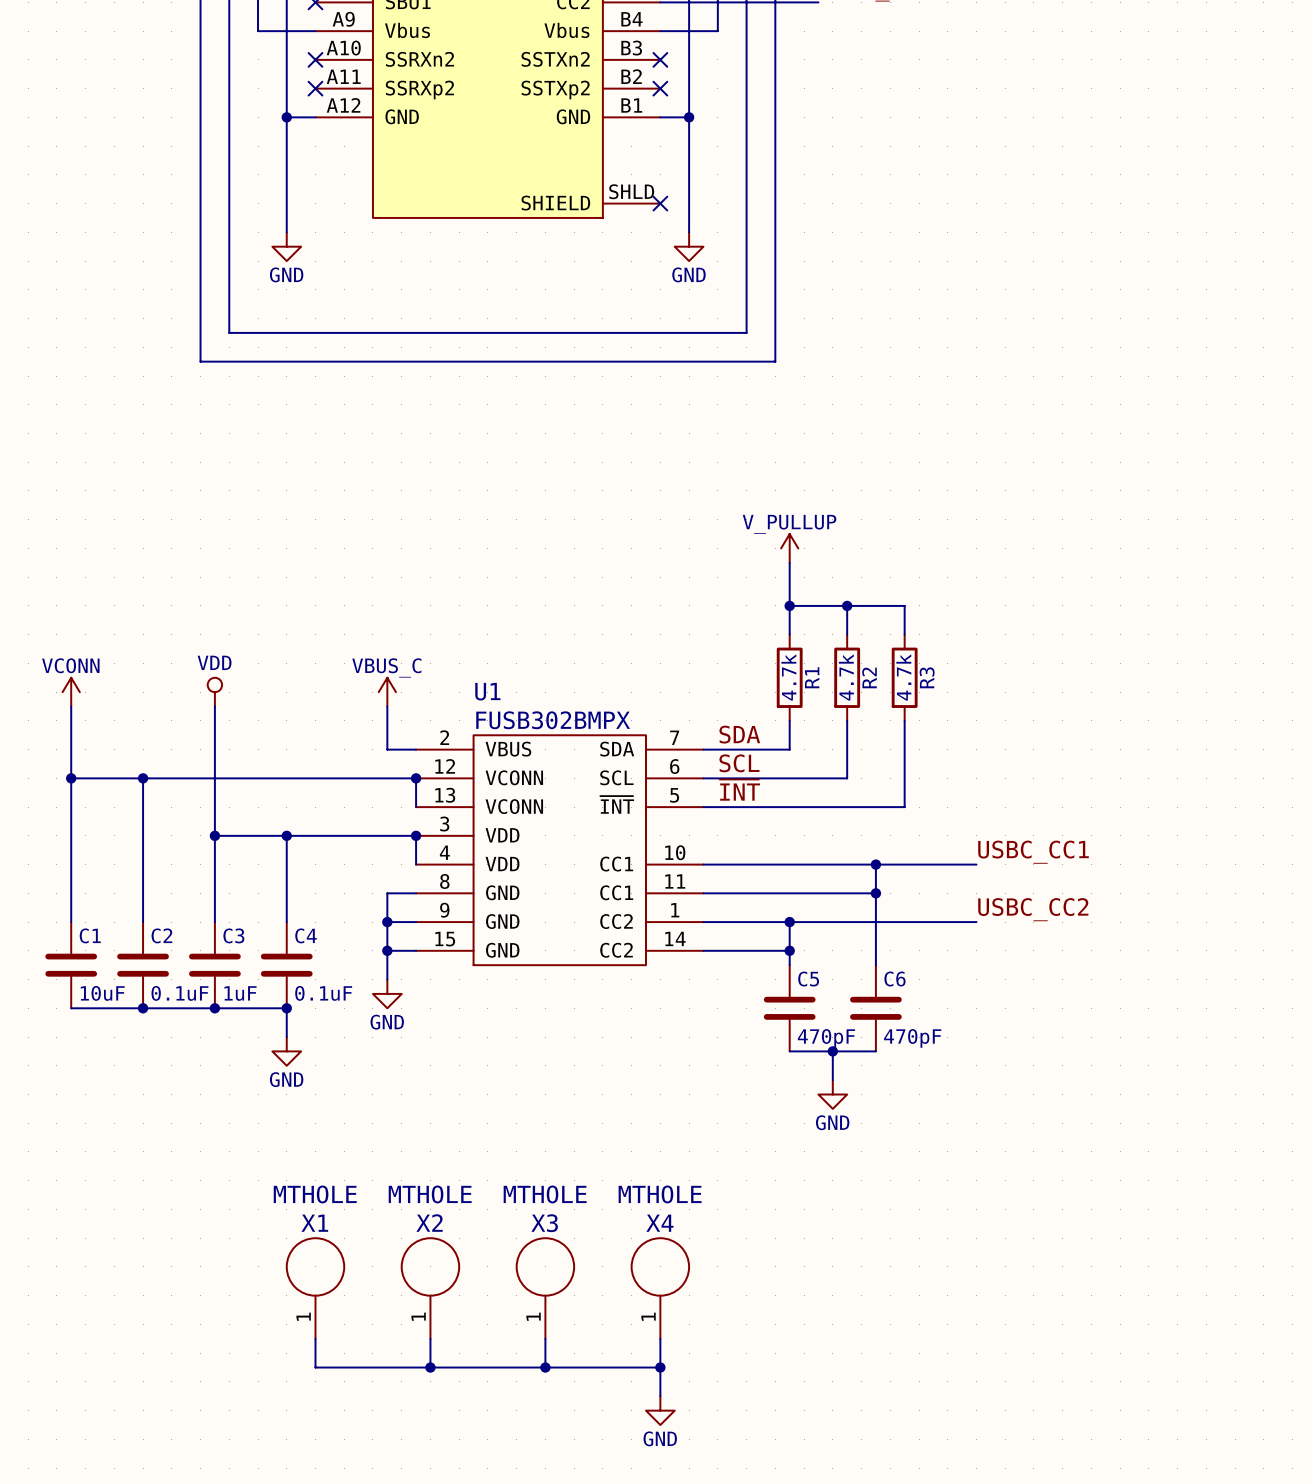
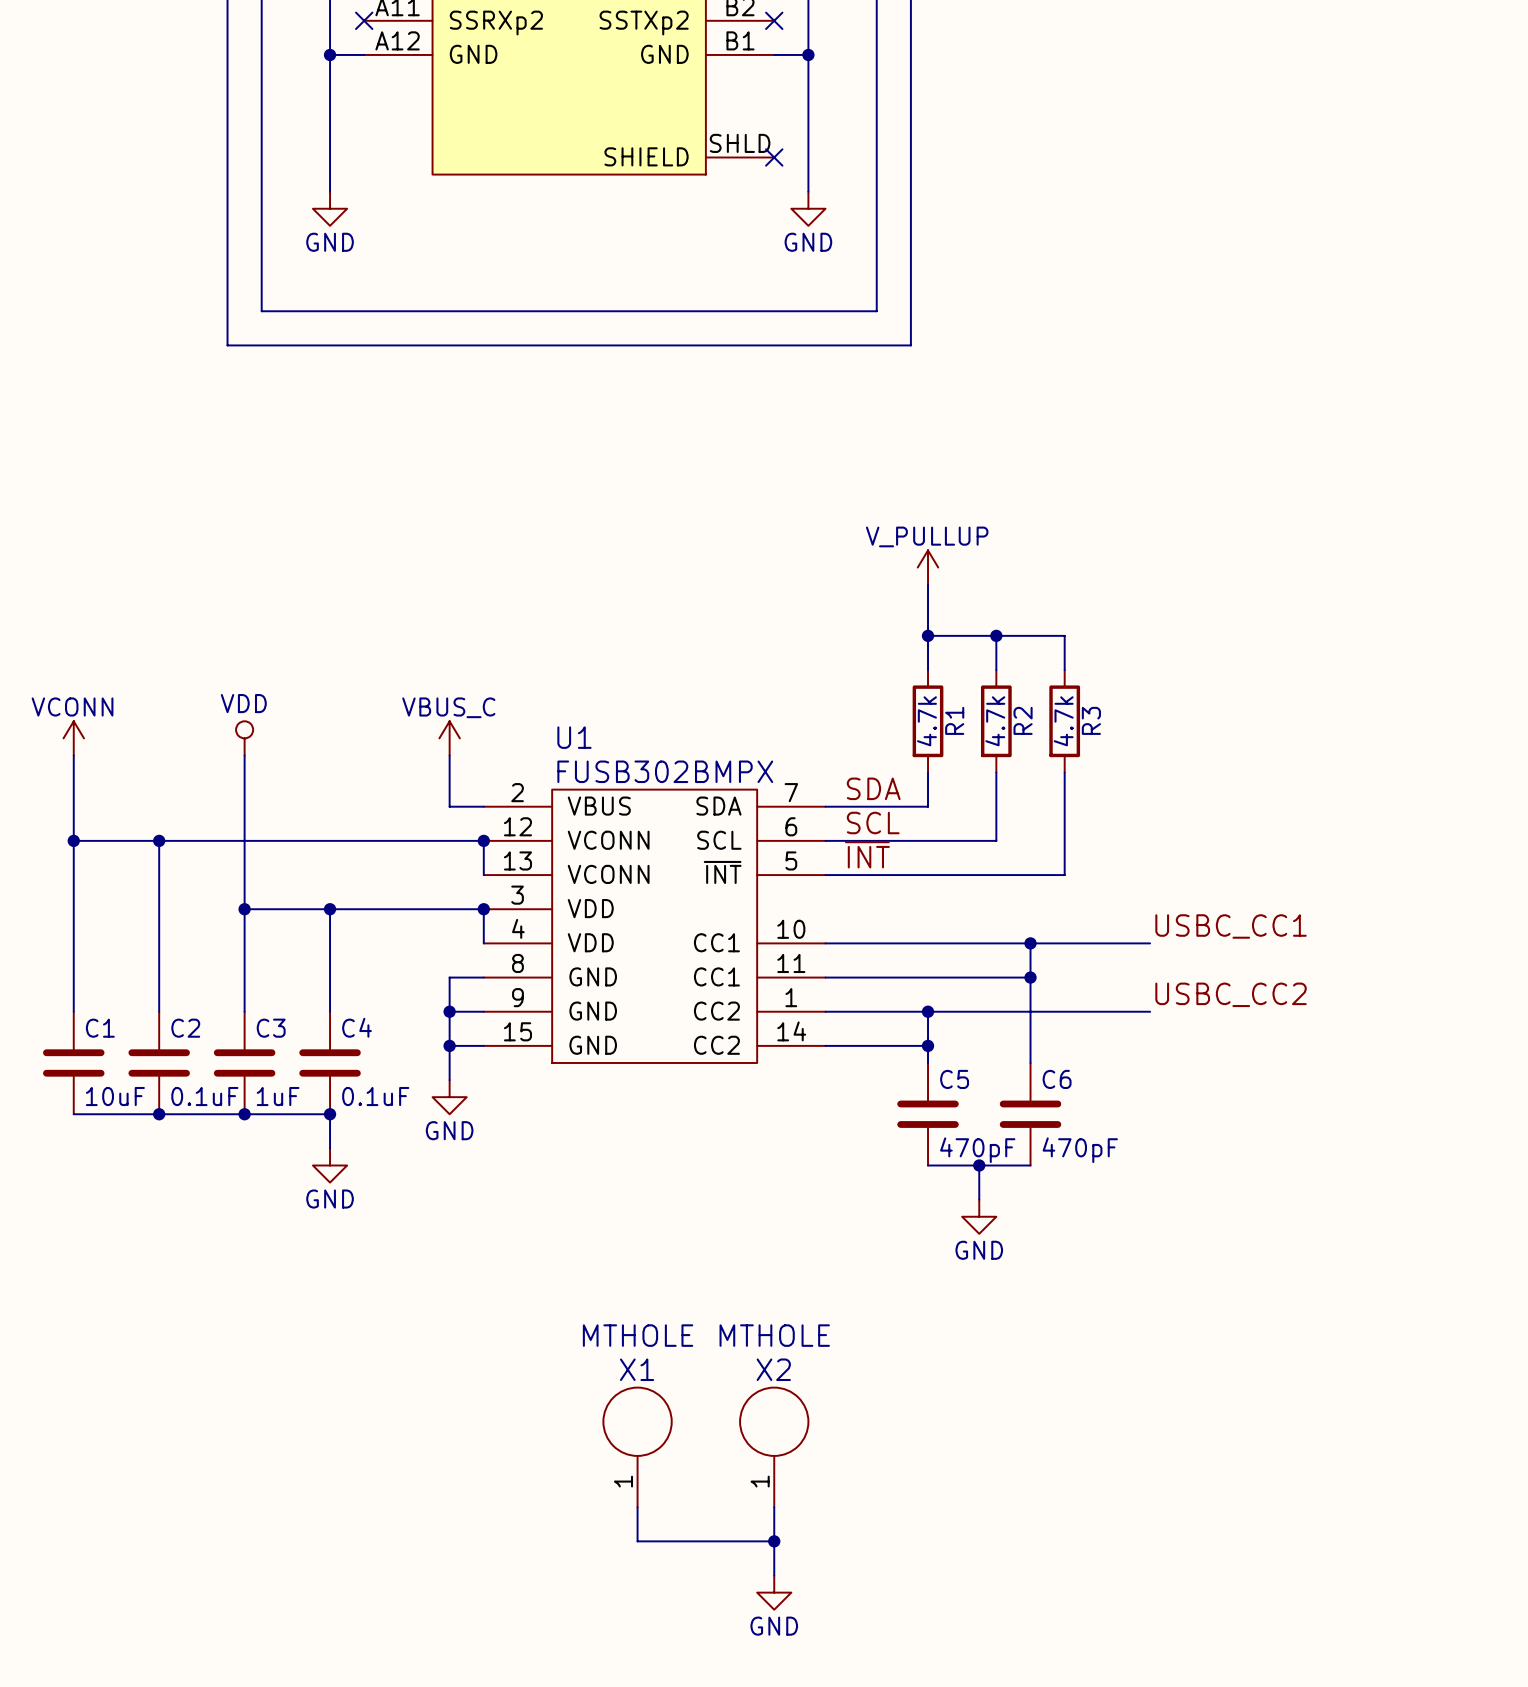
X3 name: X3 (544, 1223) -> X1 (637, 1369)
X4 name: X4 (659, 1223) -> X2 (773, 1369)
X1: MTHOLE (315, 1288) -> none
X2: MTHOLE (430, 1288) -> none
wire: (315, 1338) (315, 1367) (545, 1367) -> none
wire: (430, 1338) (430, 1367) -> none
junction: (430, 1367) -> none
junction: (545, 1367) -> none

